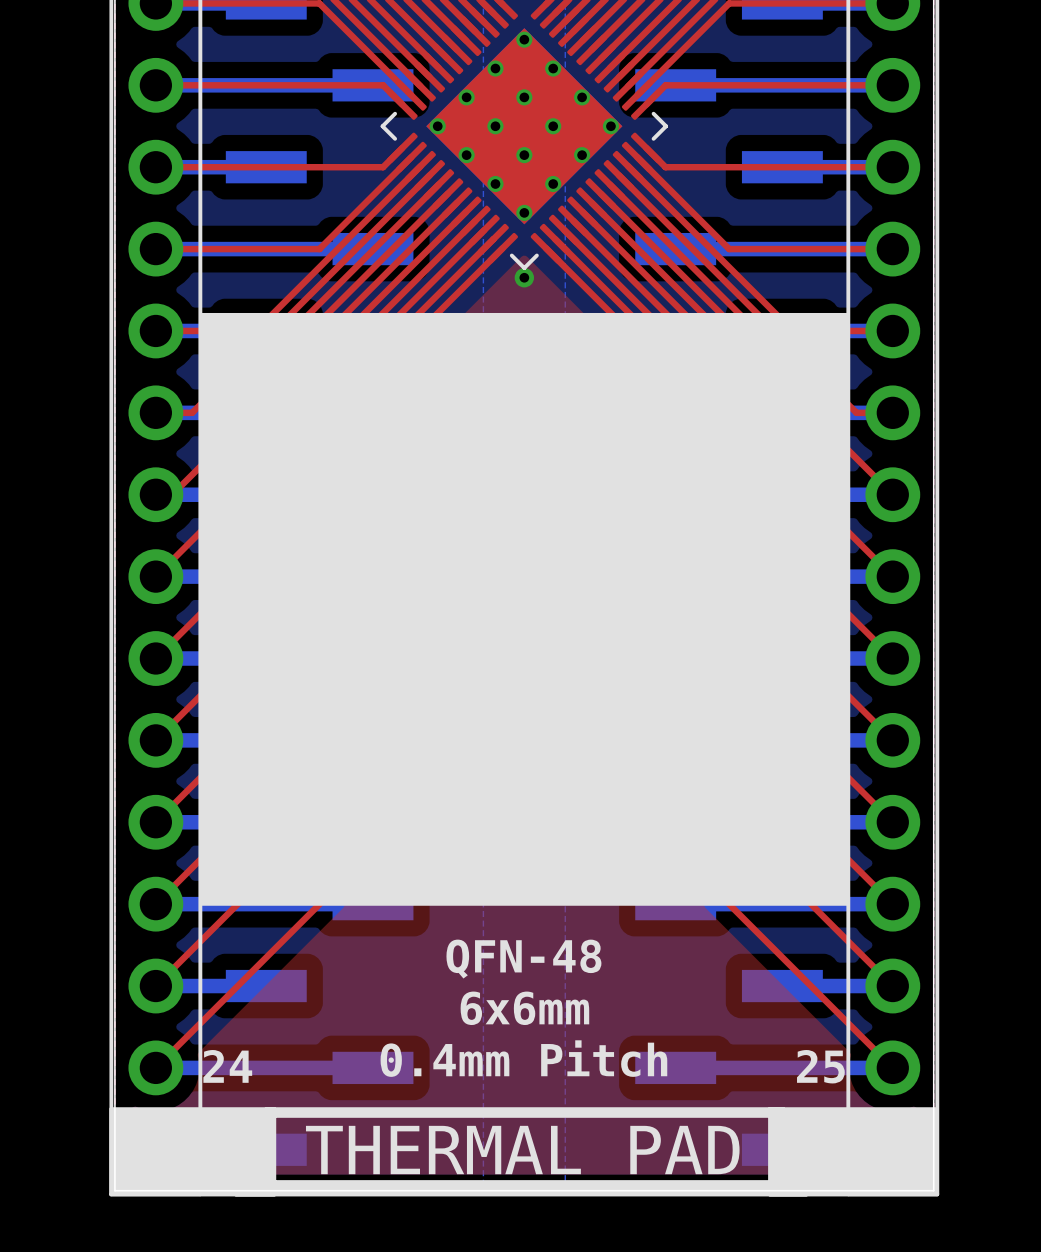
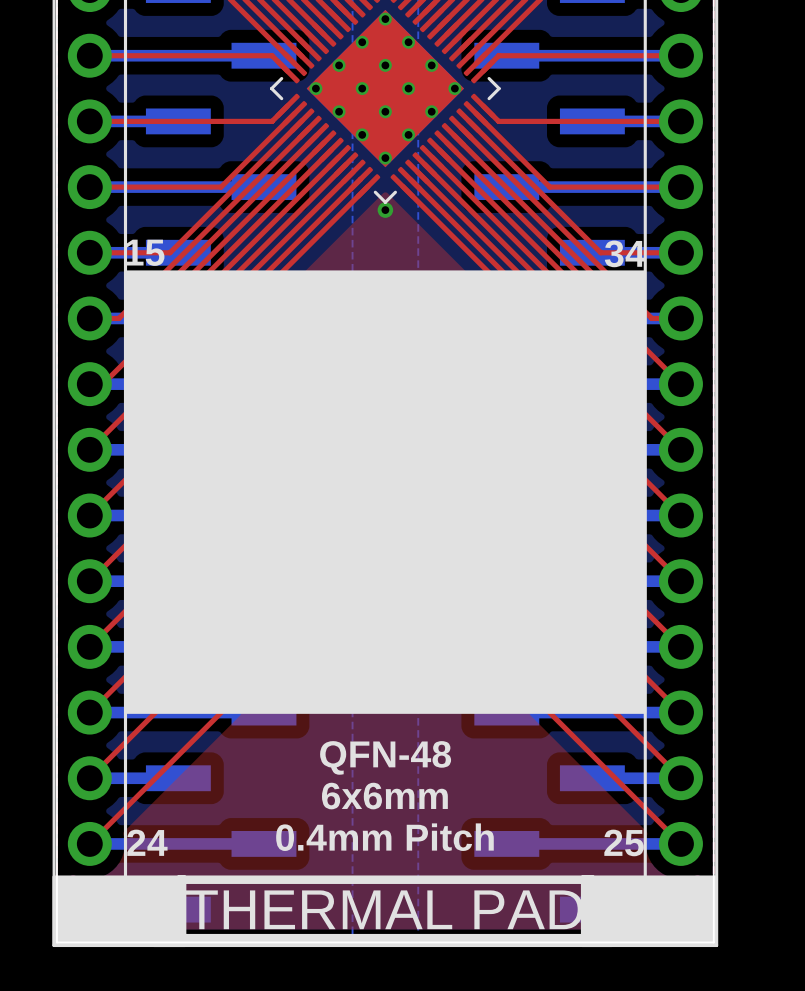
drawing shape: [199, 312, 850, 906] -> [124, 270, 647, 714]
text: none -> 15 (145, 252)
text: none -> 34 (625, 253)

